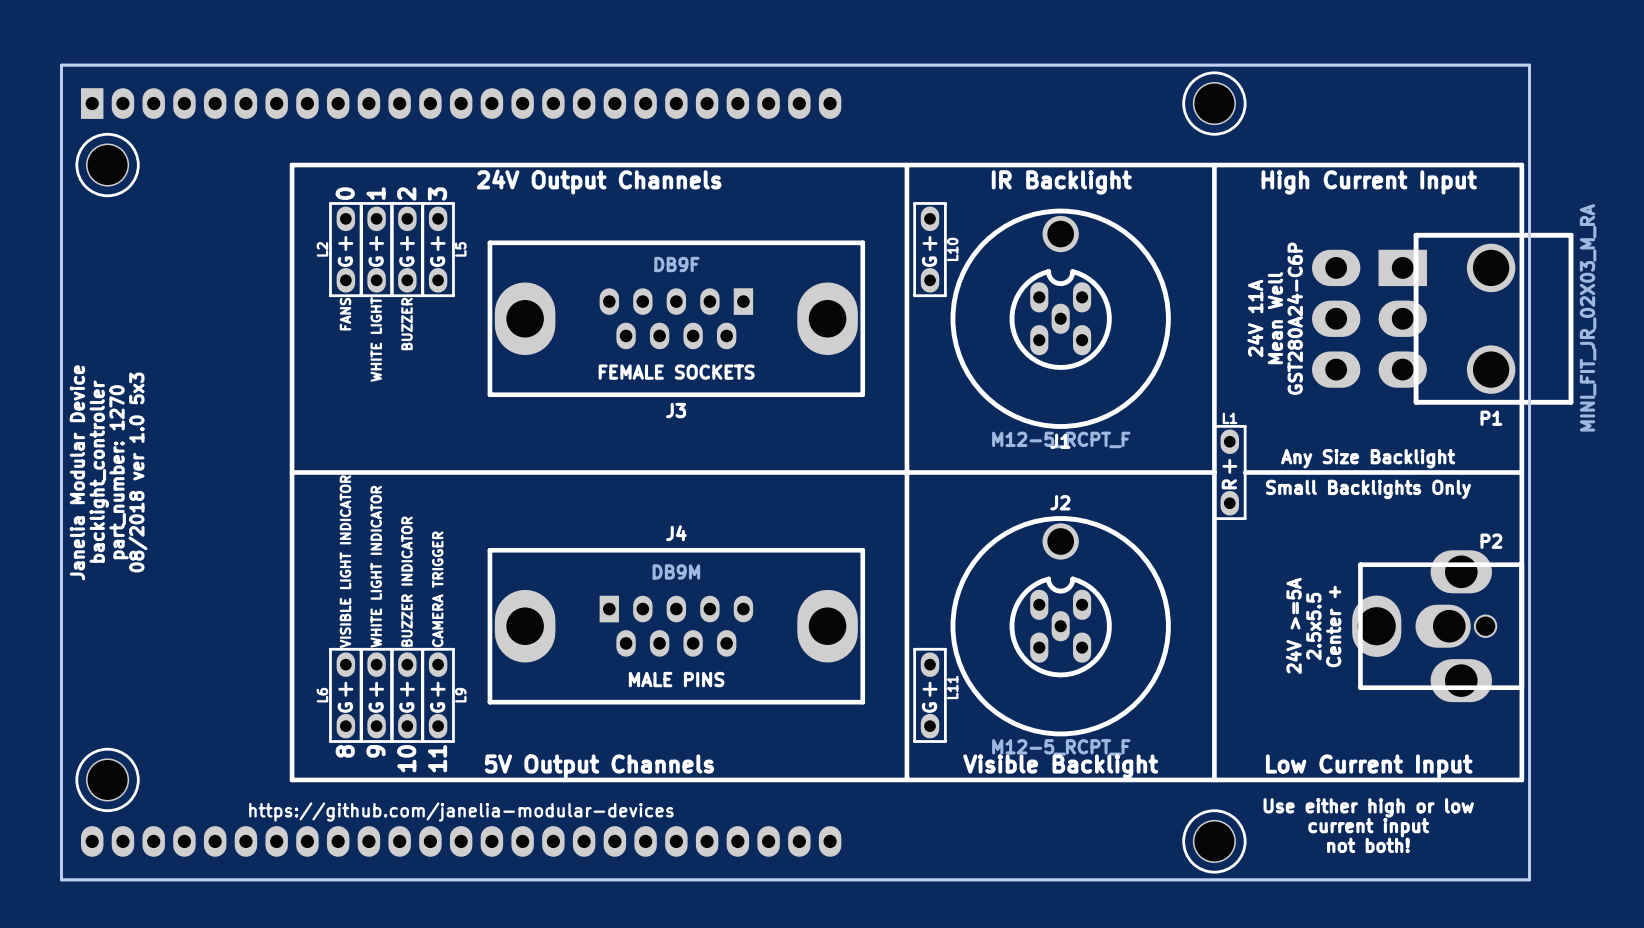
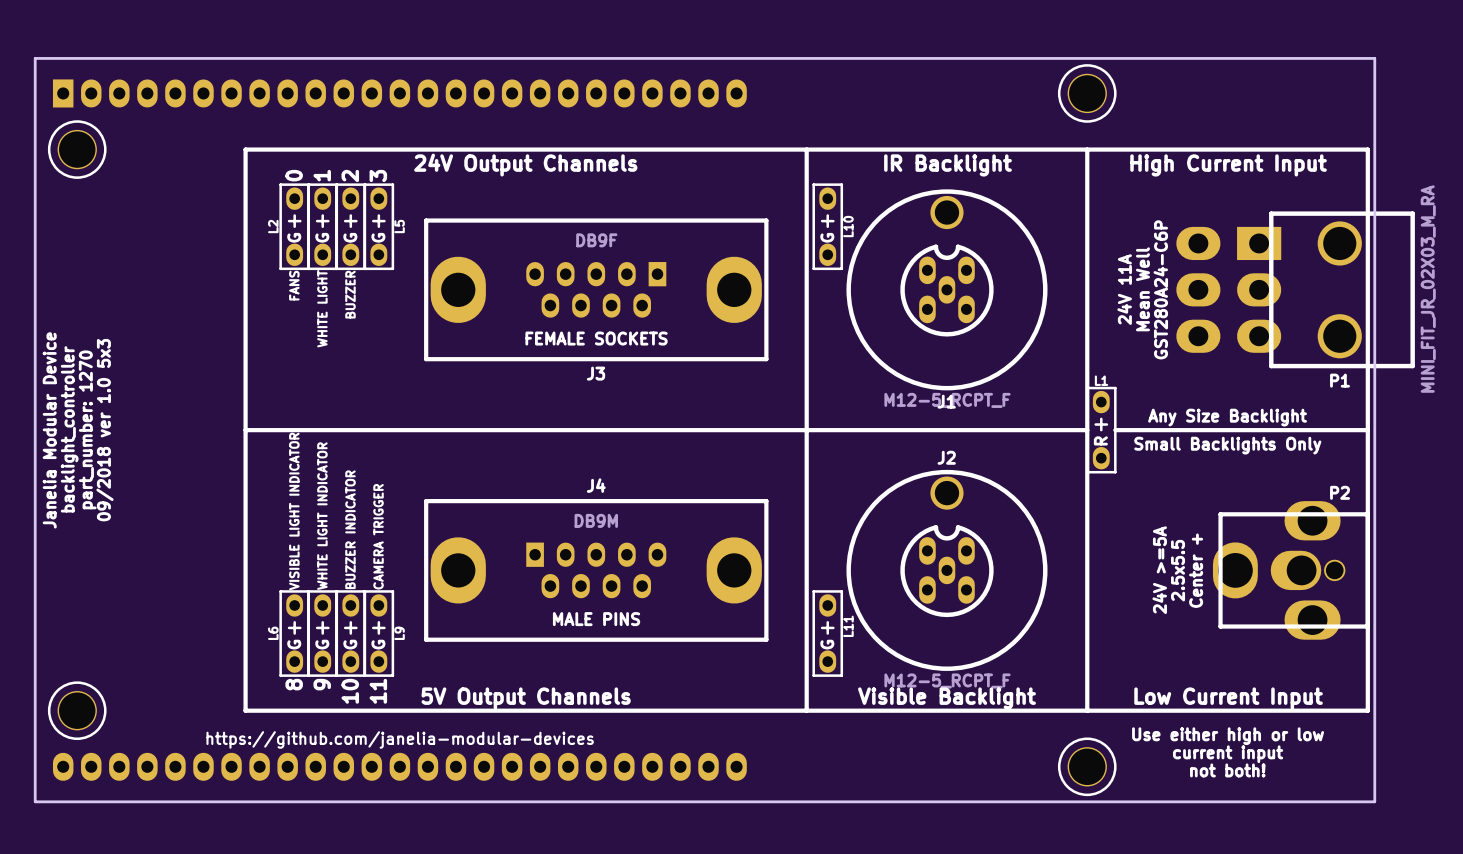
text: 08/2018 ver 1.0 5x3 (137, 472) -> 09/2018 ver 1.0 5x3 (104, 430)

